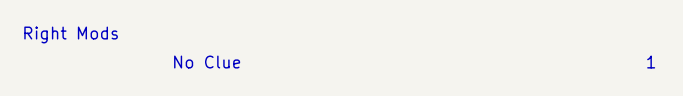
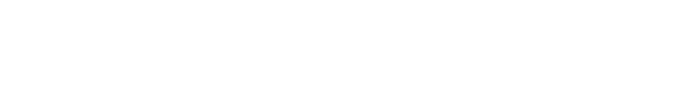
text: Right Mods (71, 34) -> none
text: No Clue (207, 62) -> none
text: 1 (651, 62) -> none

